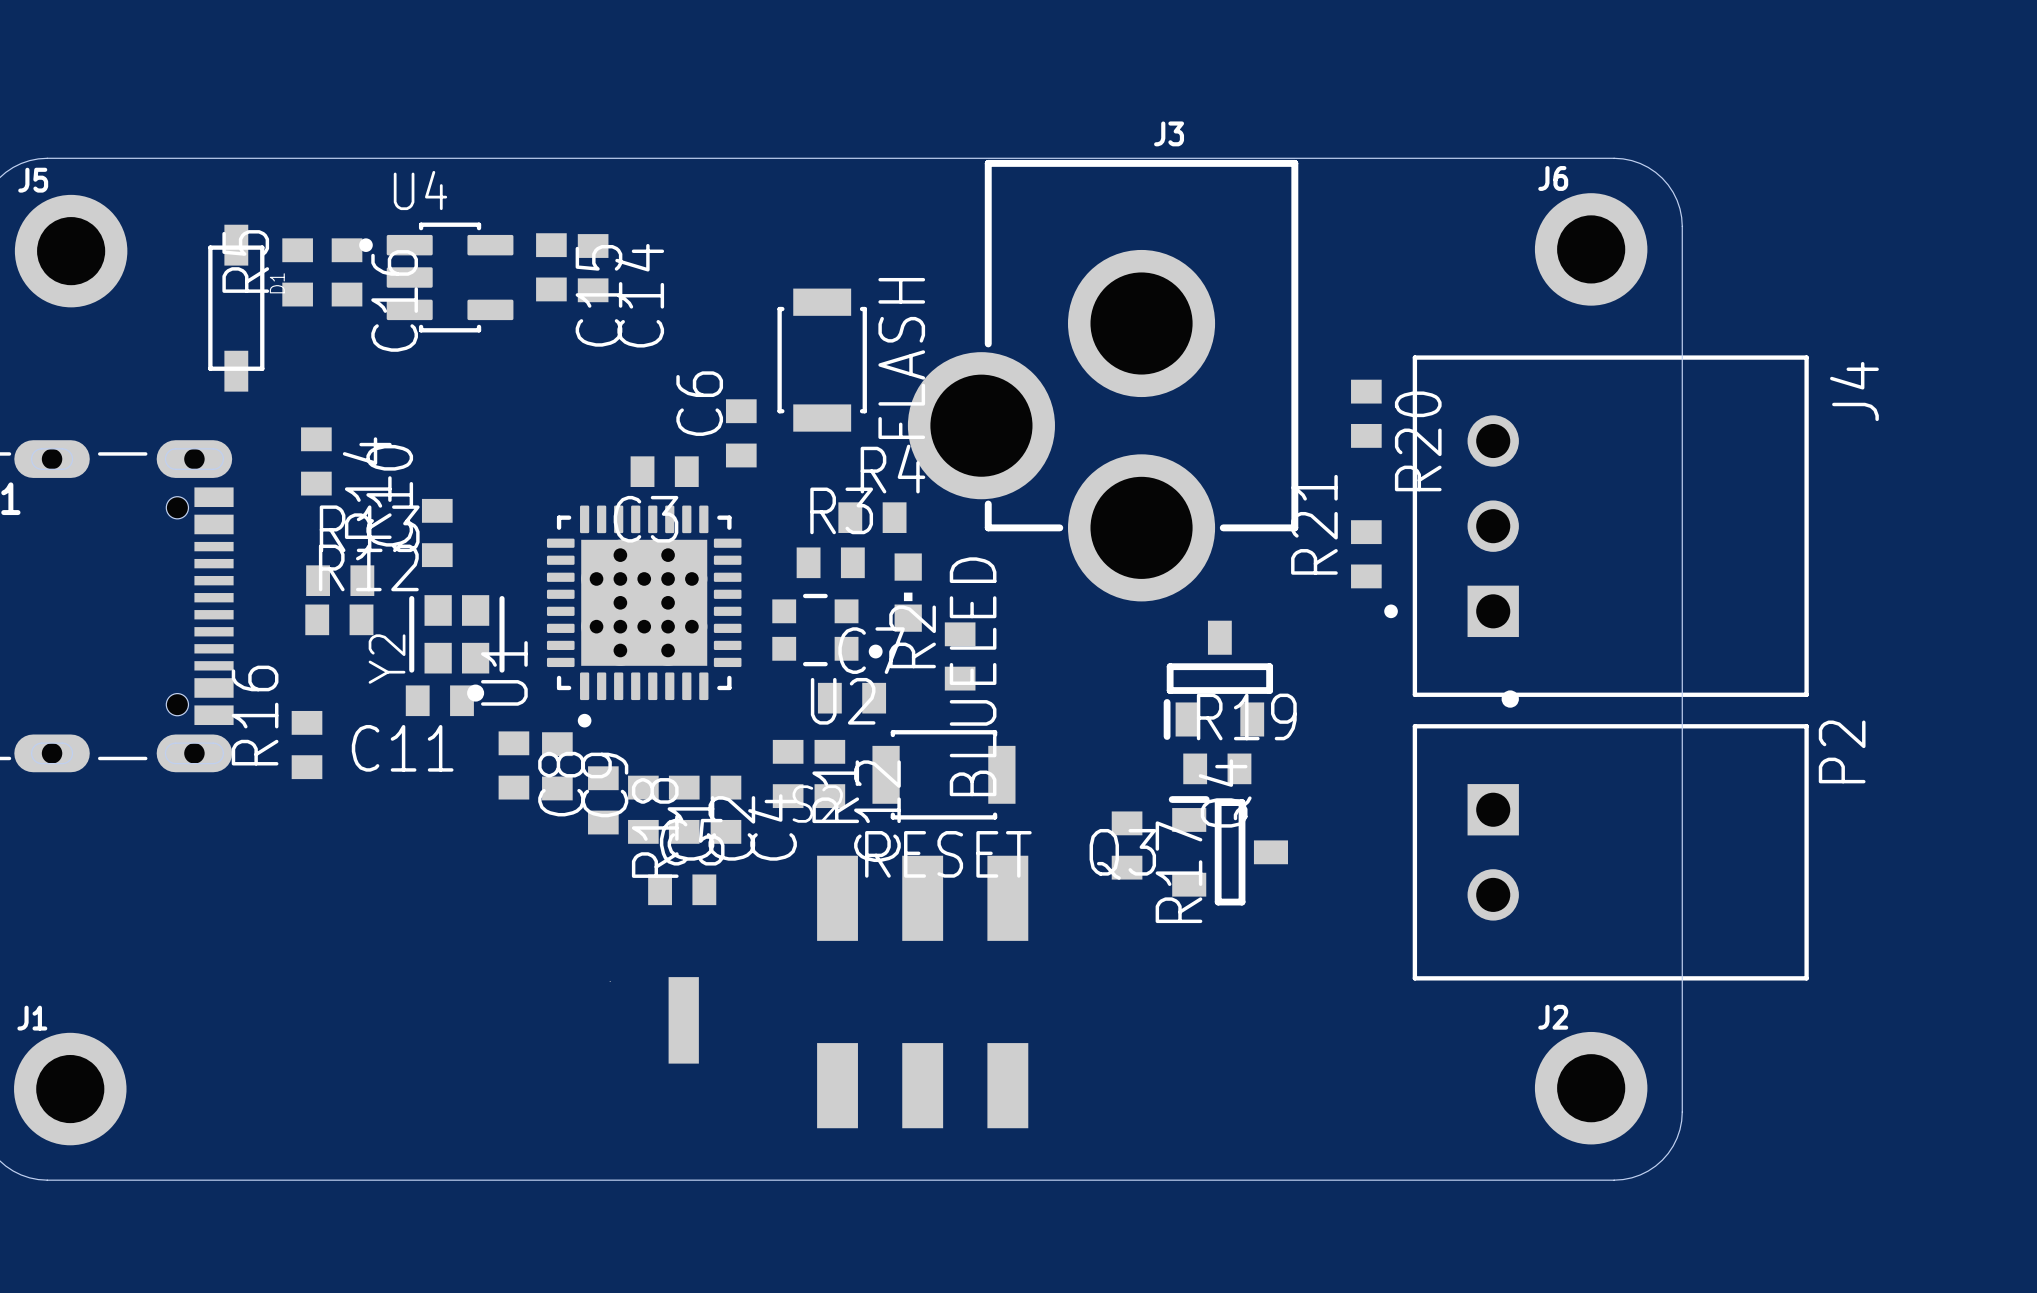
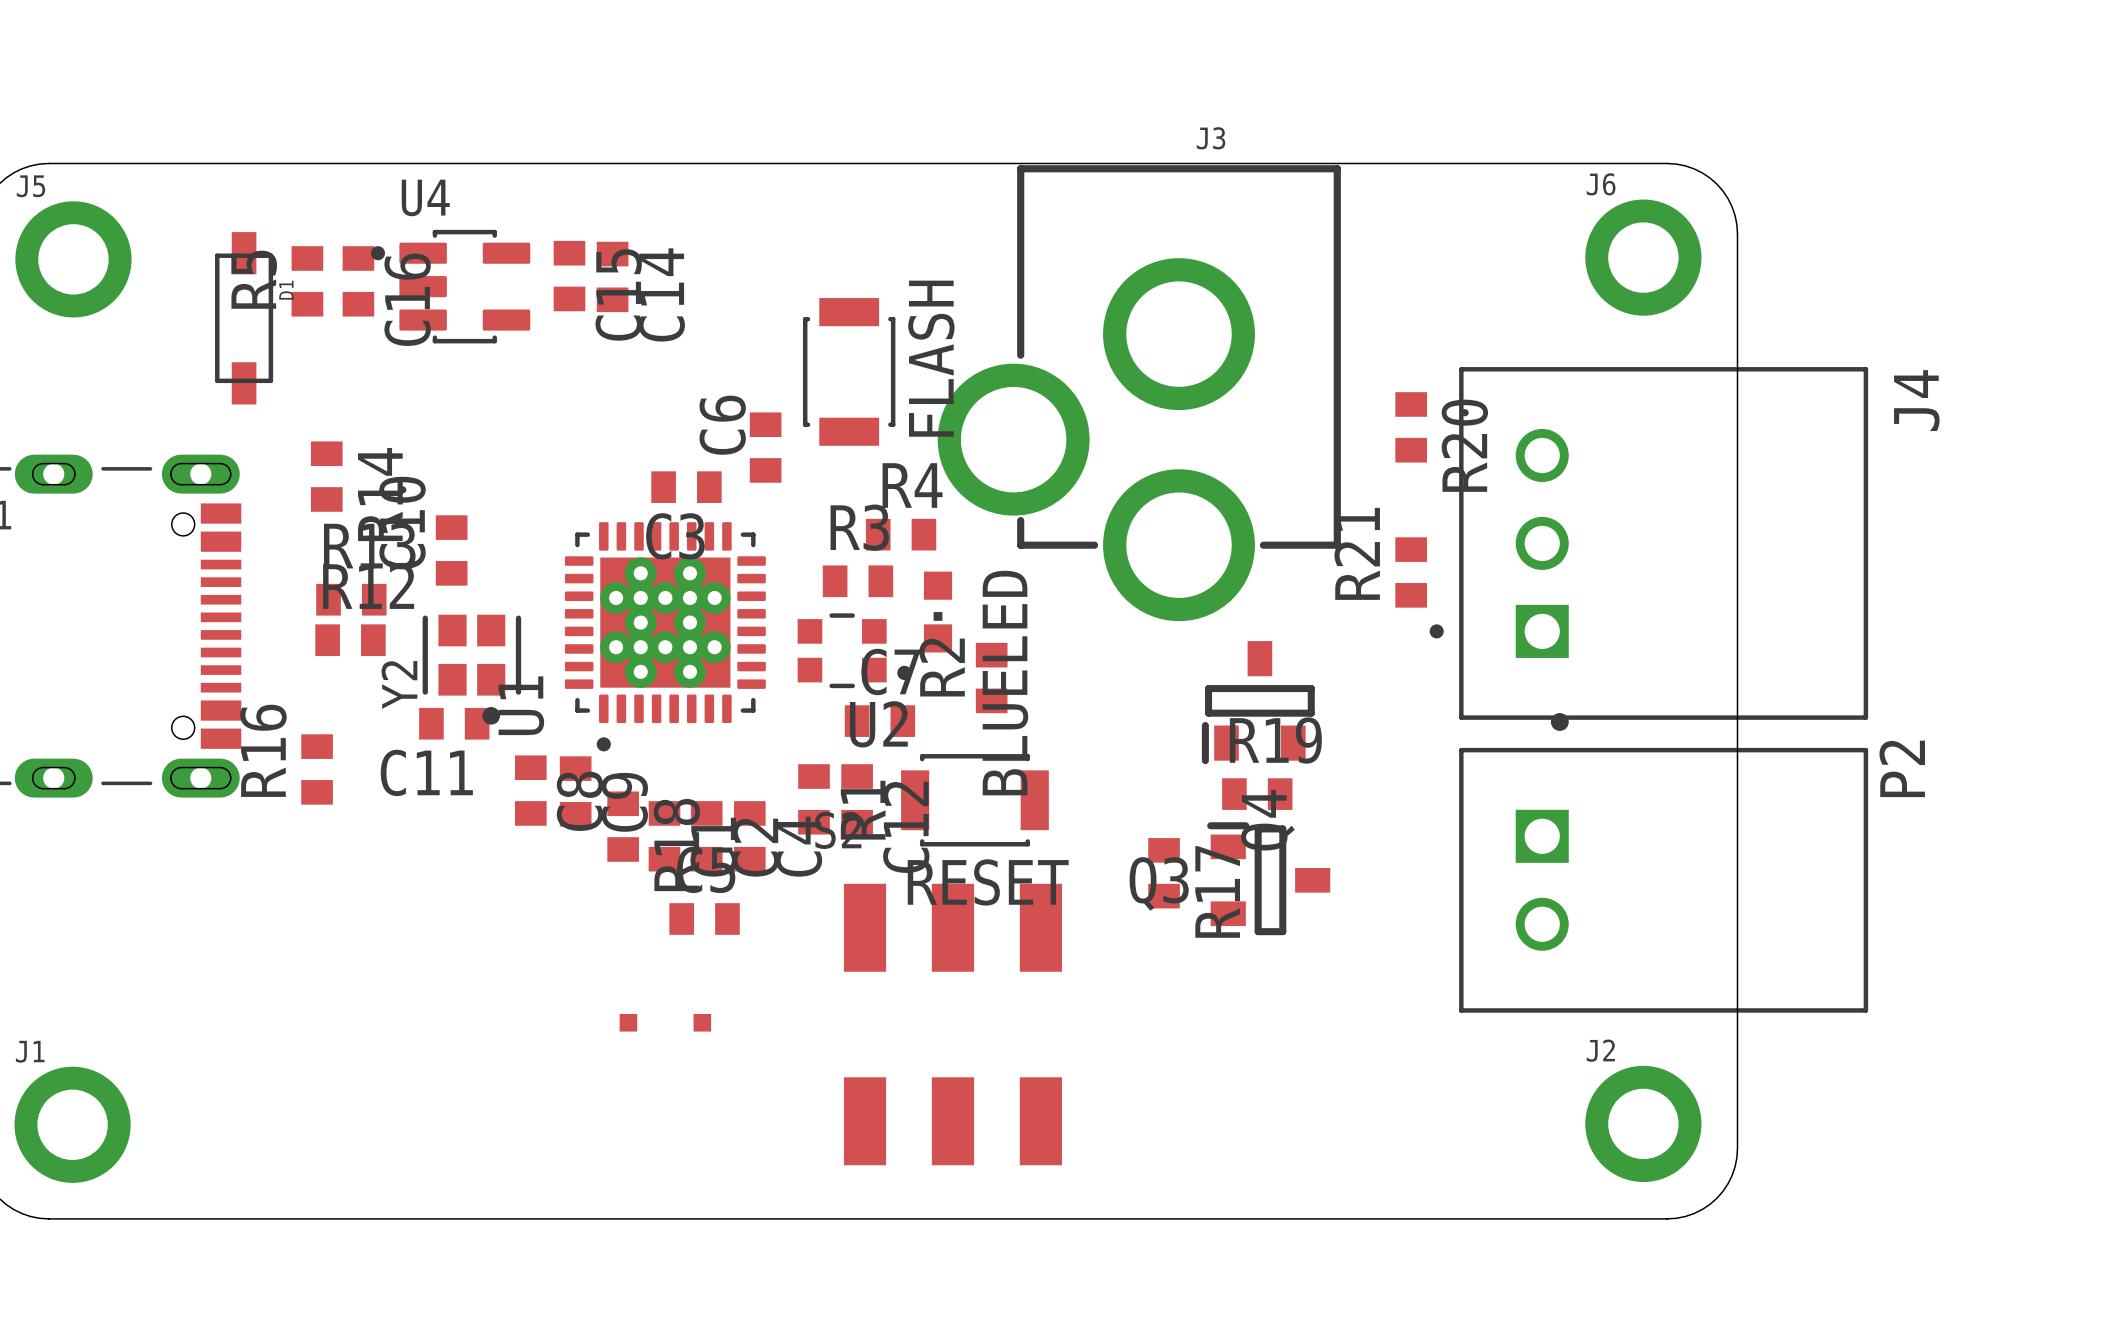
part footprint: [609, 977, 699, 1064] -> [619, 1013, 712, 1032]

